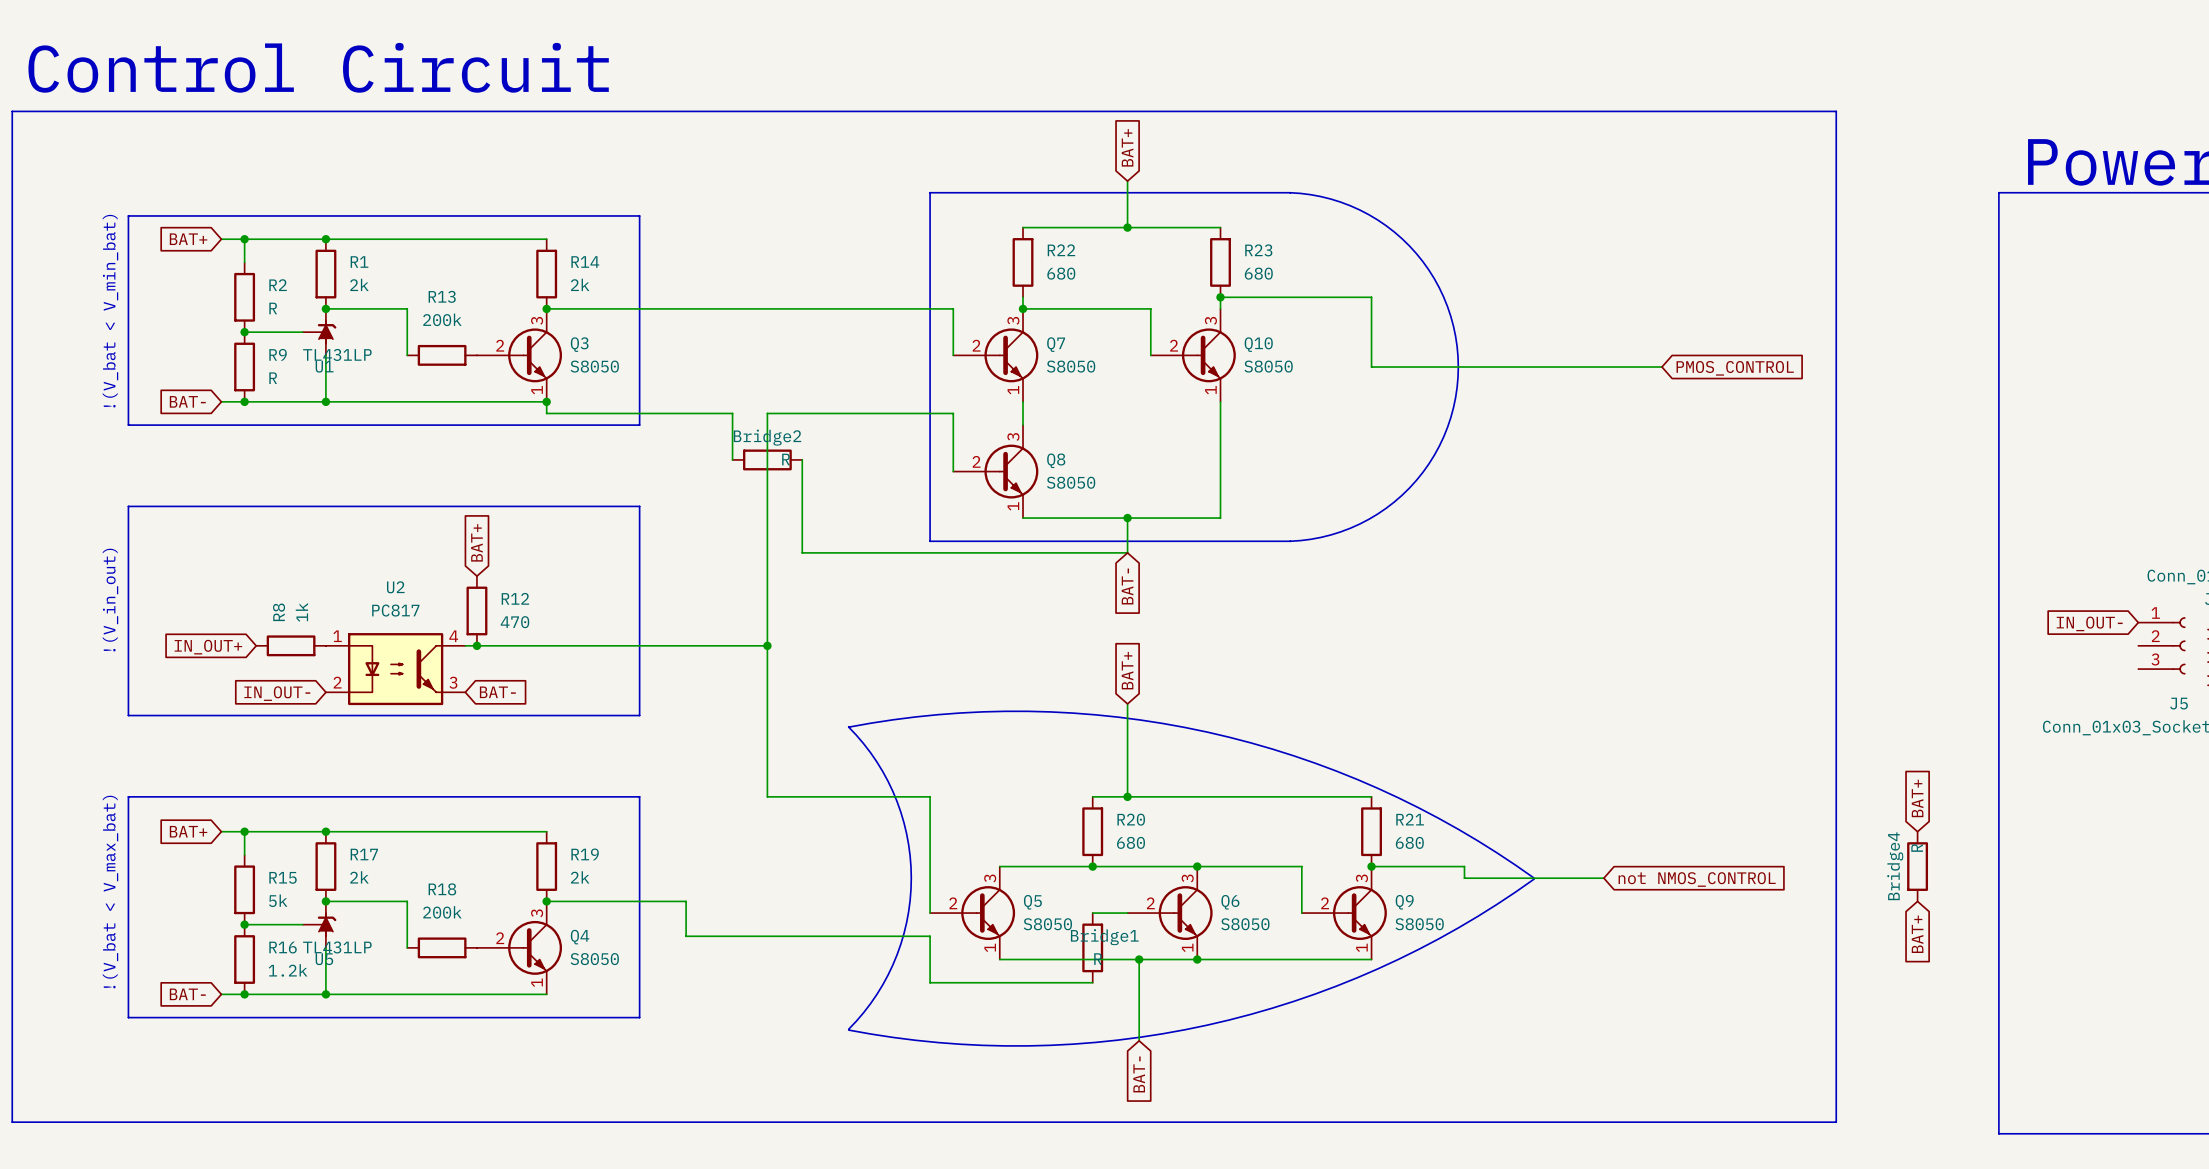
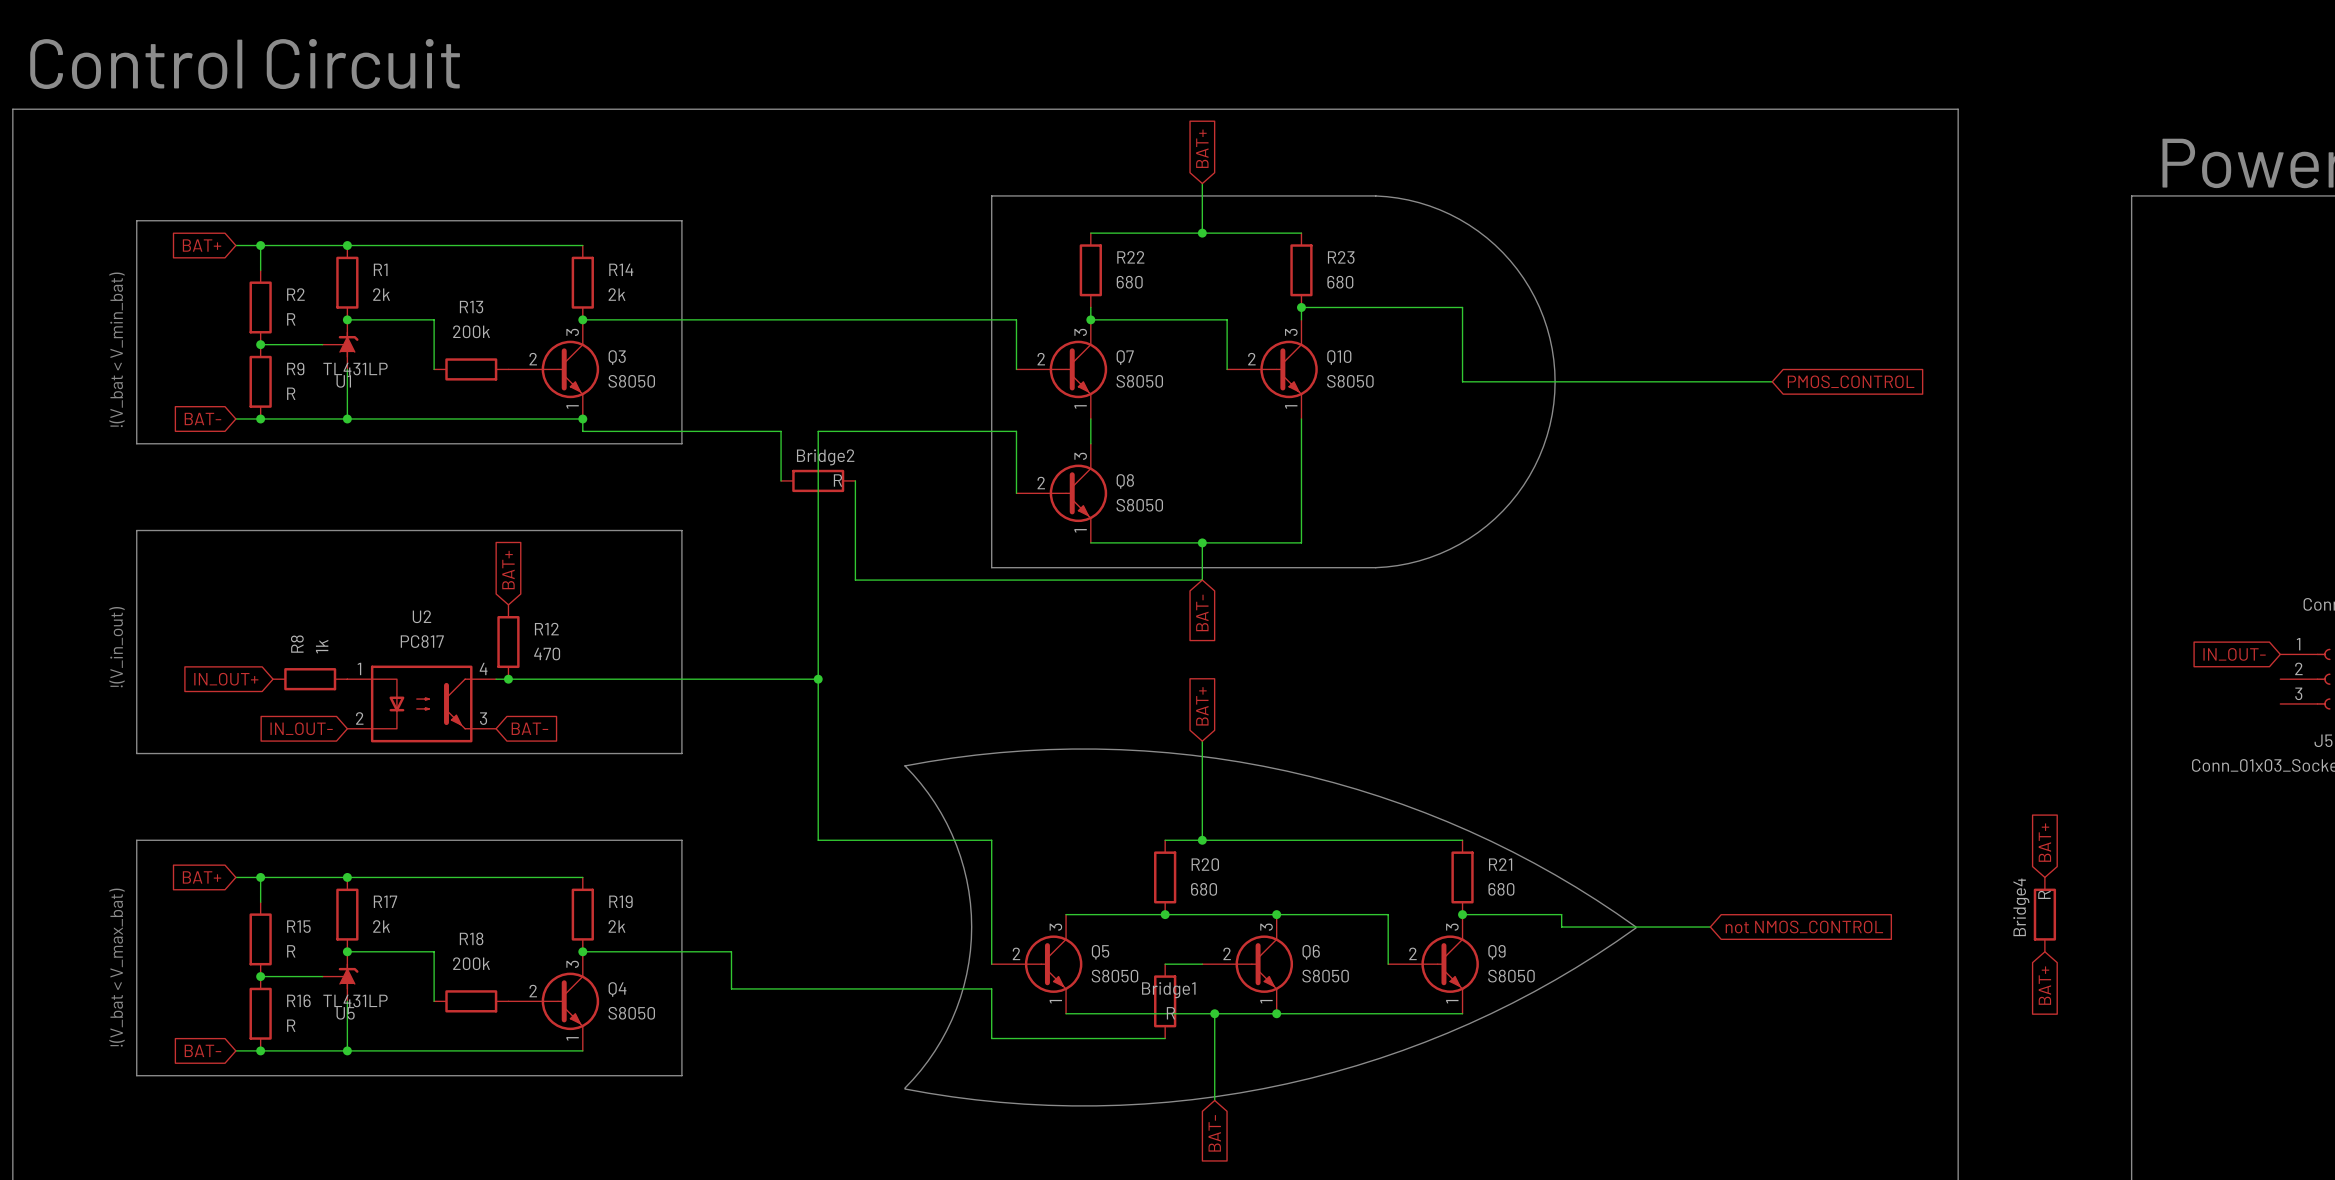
R15 value: 5k (278, 900) -> R (291, 951)
R16 value: 1.2k (288, 970) -> R (291, 1025)

